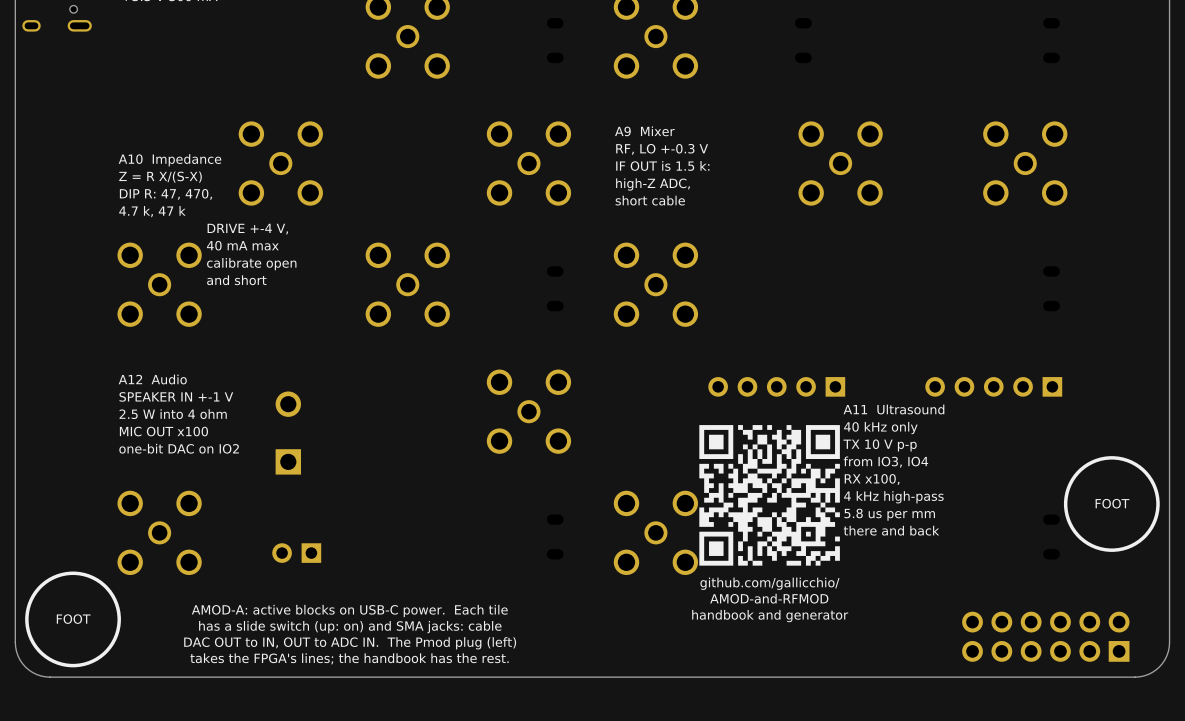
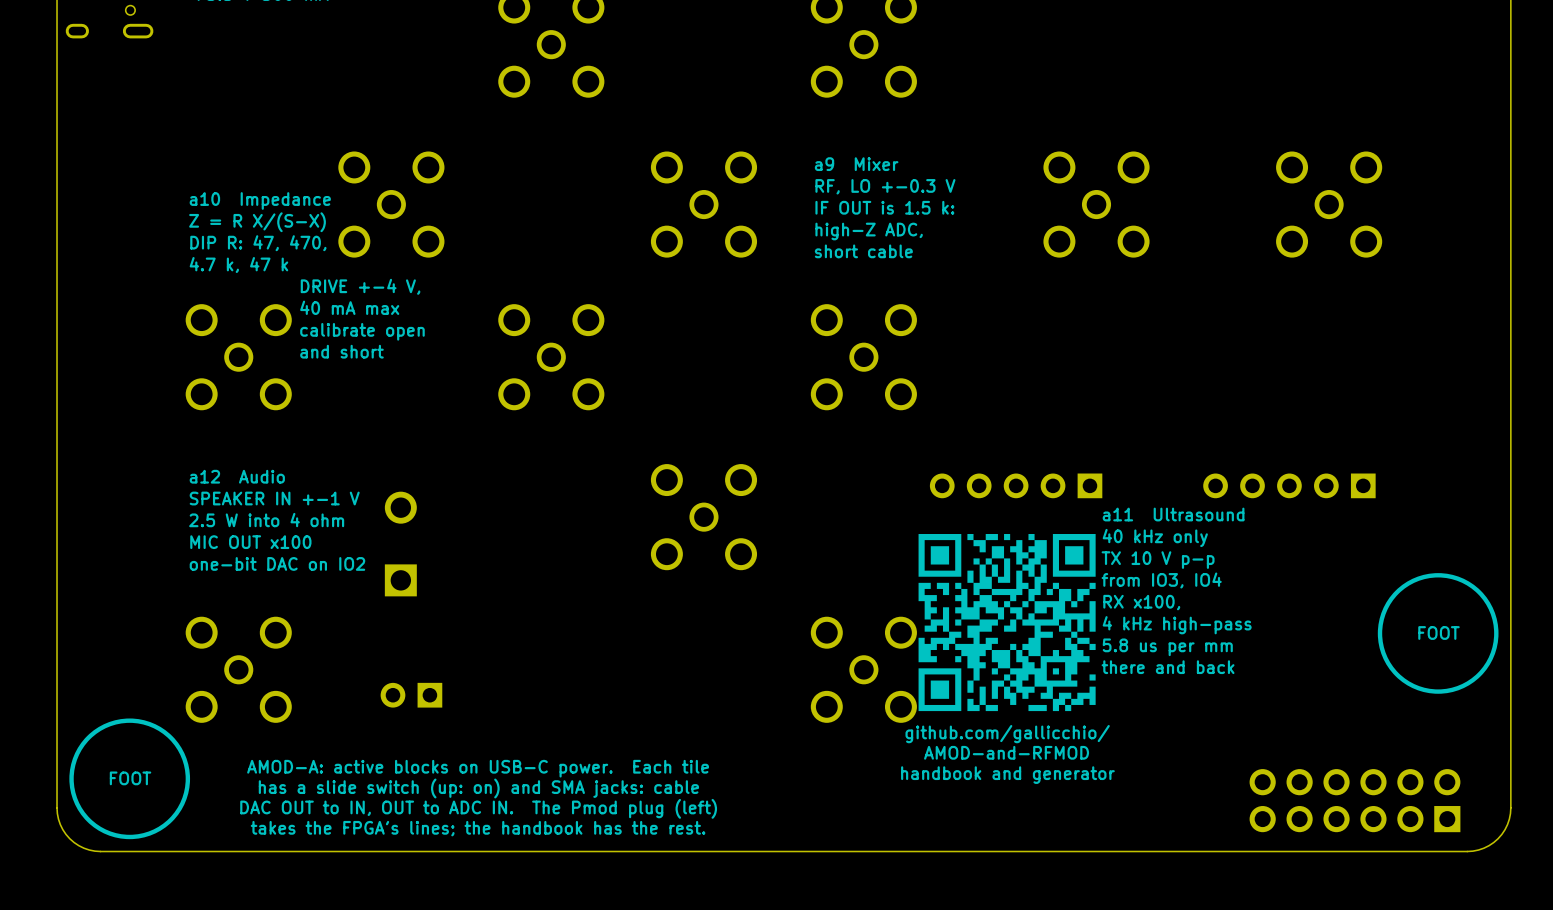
text: A9 Mixer (644, 131) -> a9 Mixer (856, 164)
text: A10 Impedance (170, 160) -> a10 Impedance (260, 200)
text: A12 Audio (152, 379) -> a12 Audio (237, 476)
text: A11 Ultrasound (893, 409) -> a11 Ultrasound (1173, 514)

